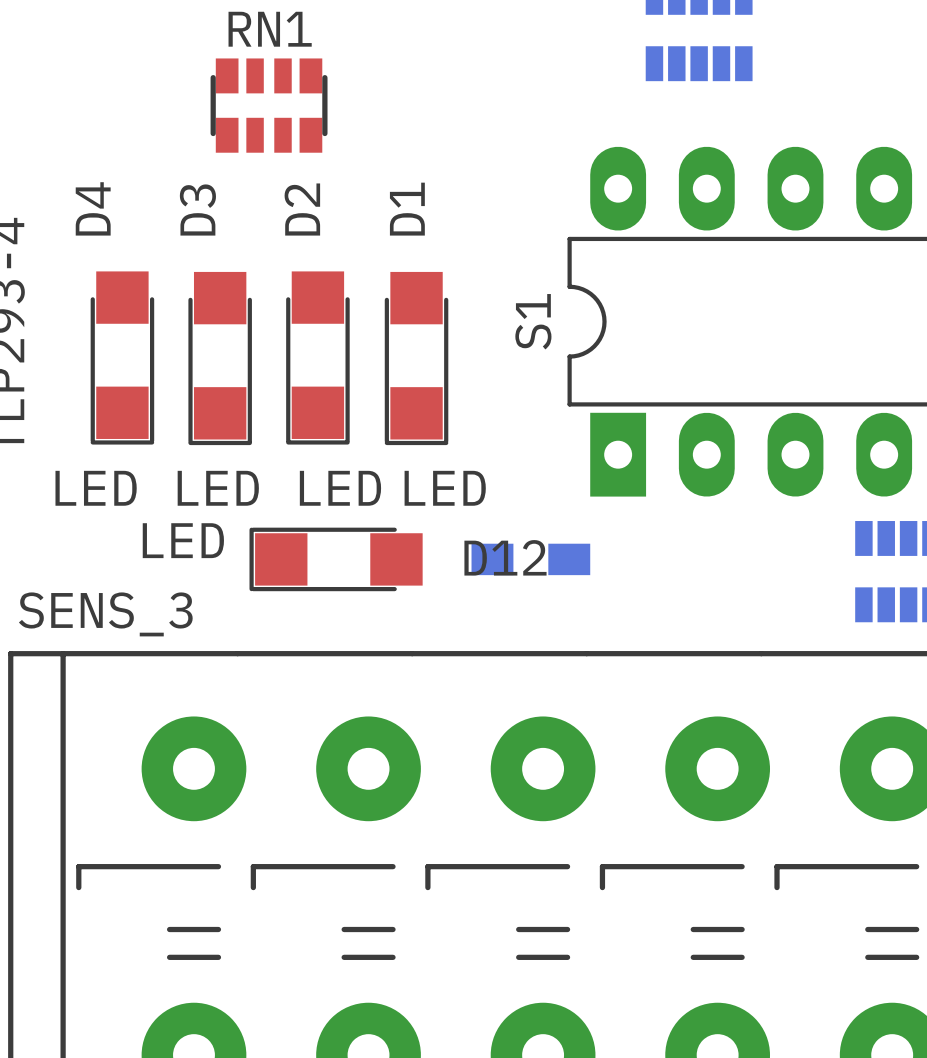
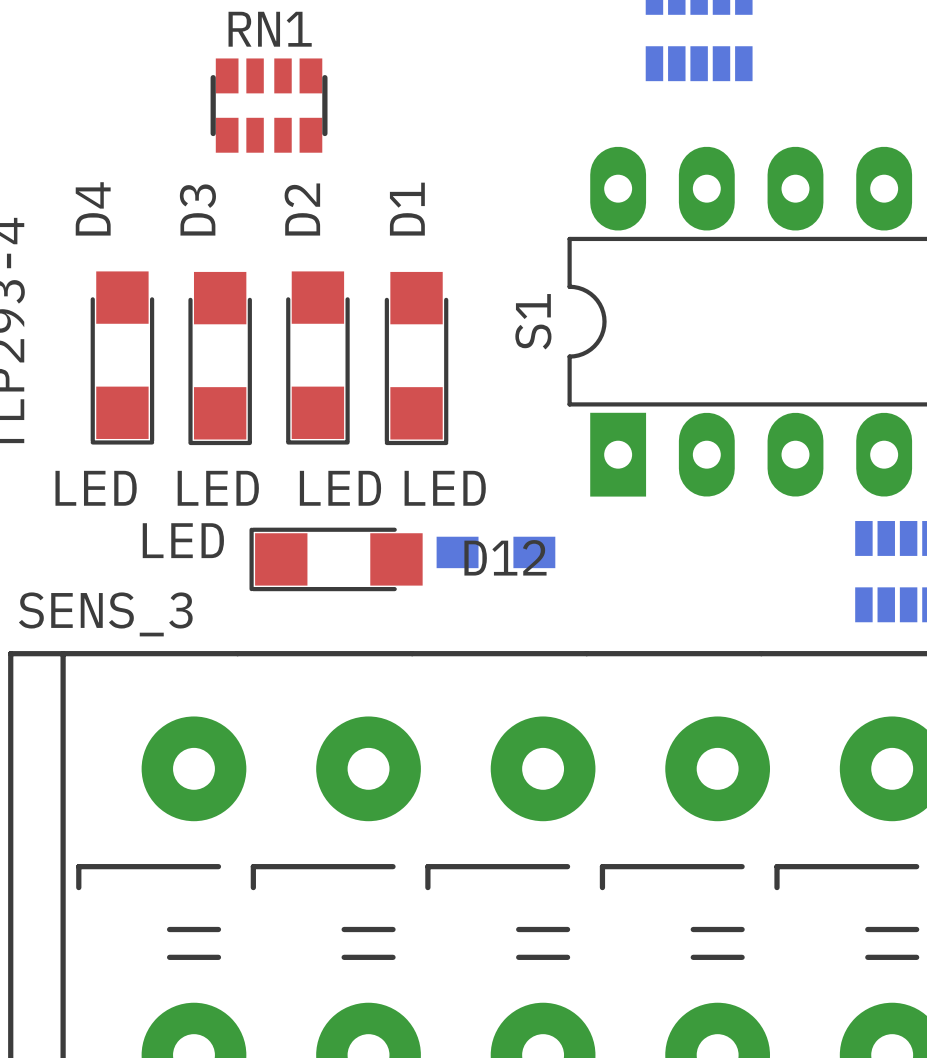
part position: (530, 559) -> (495, 552)

